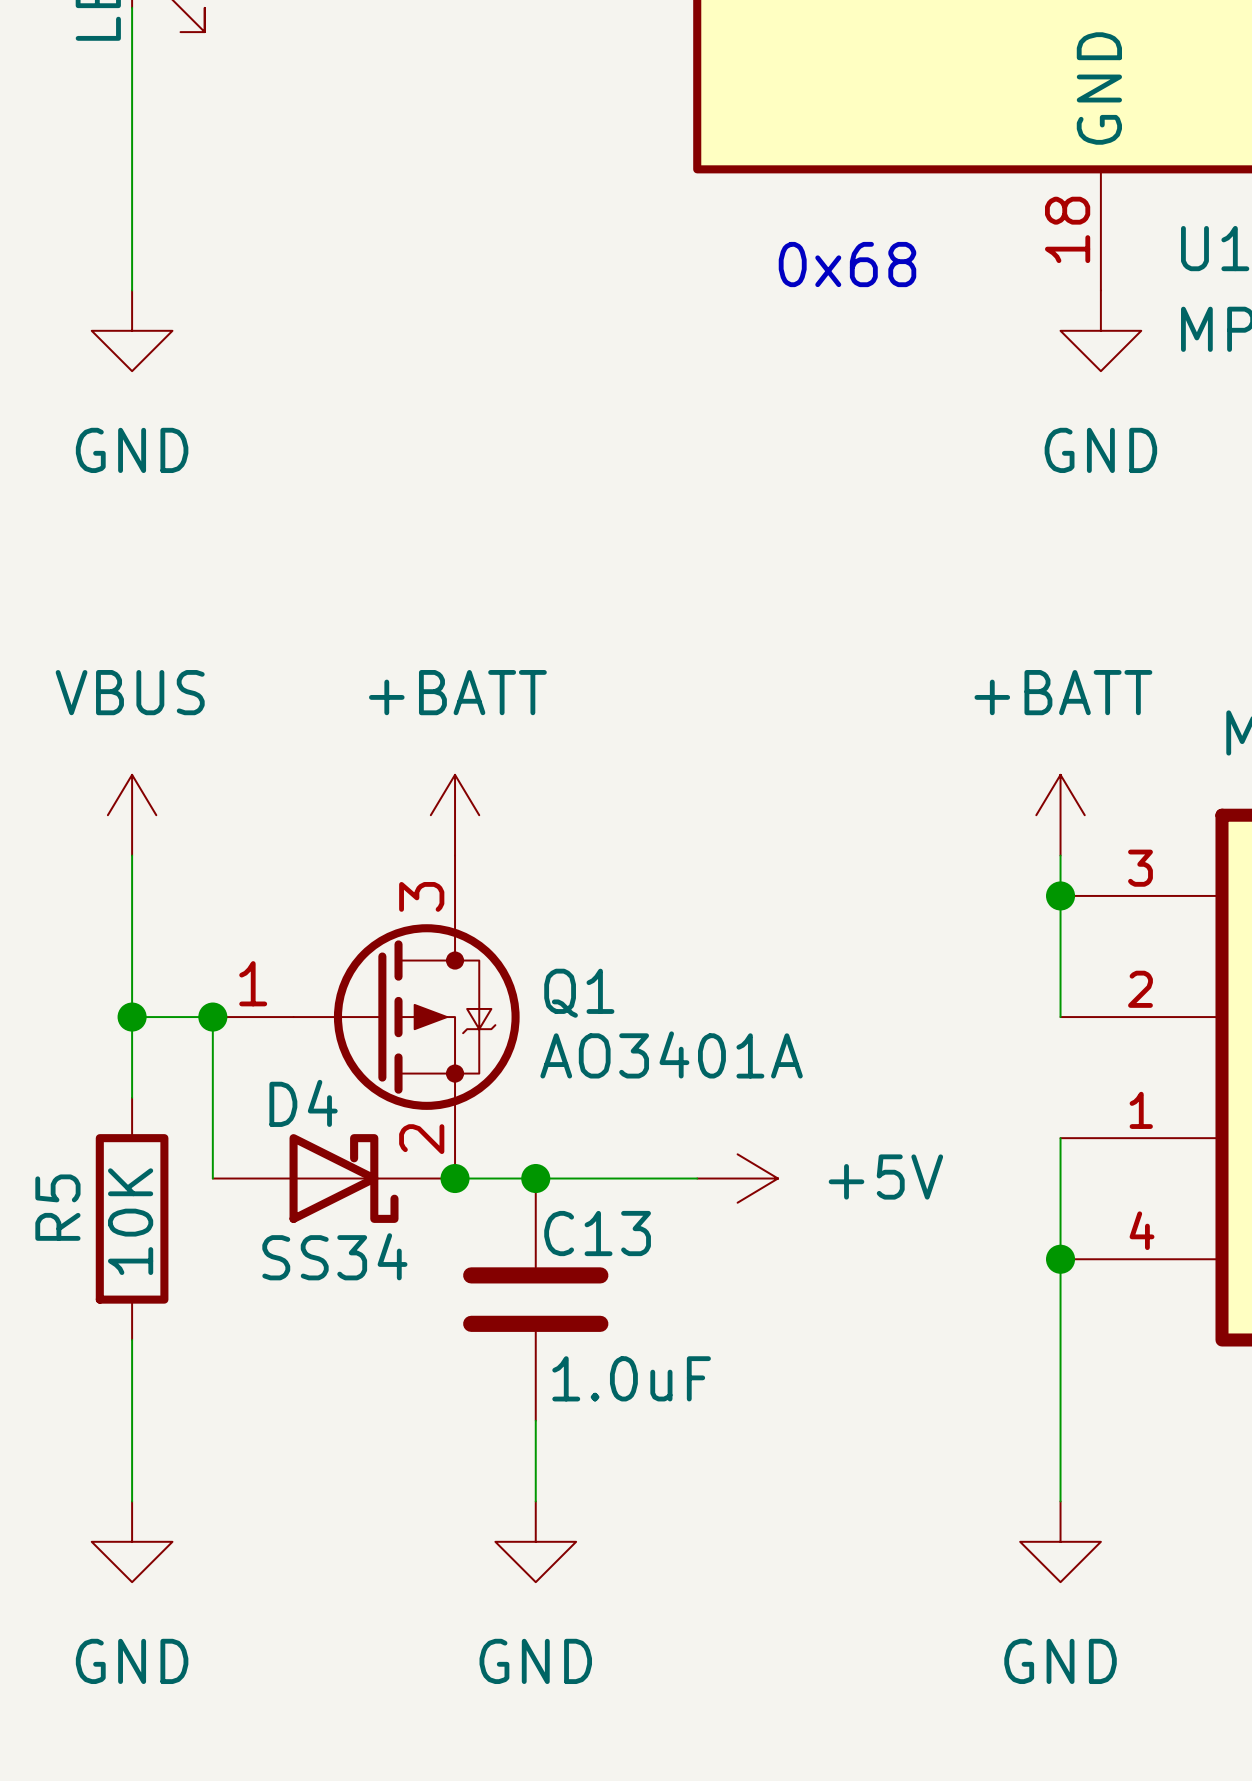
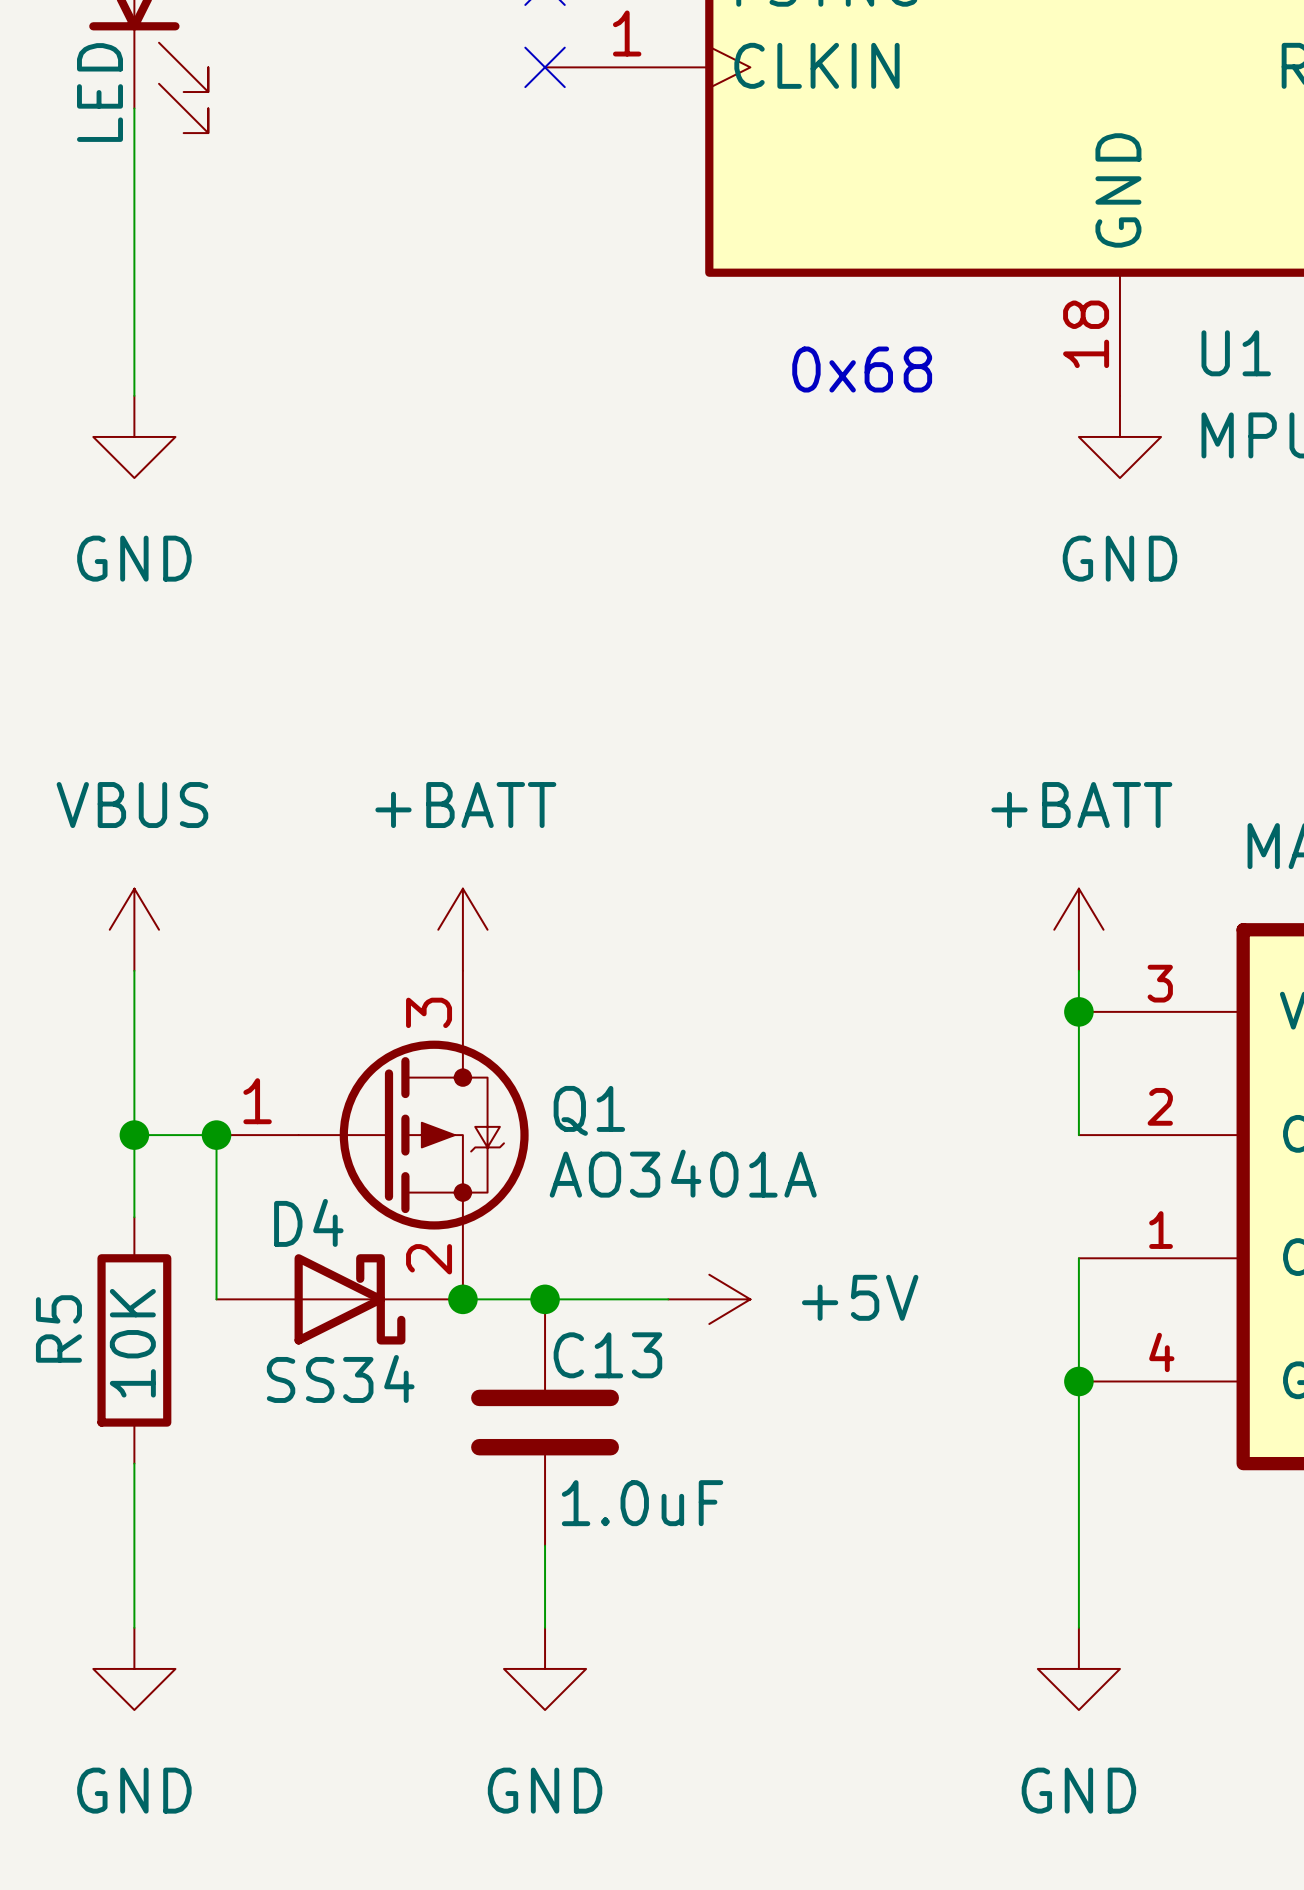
power symbol position: +5V (737, 1178) -> +5V (709, 1299)

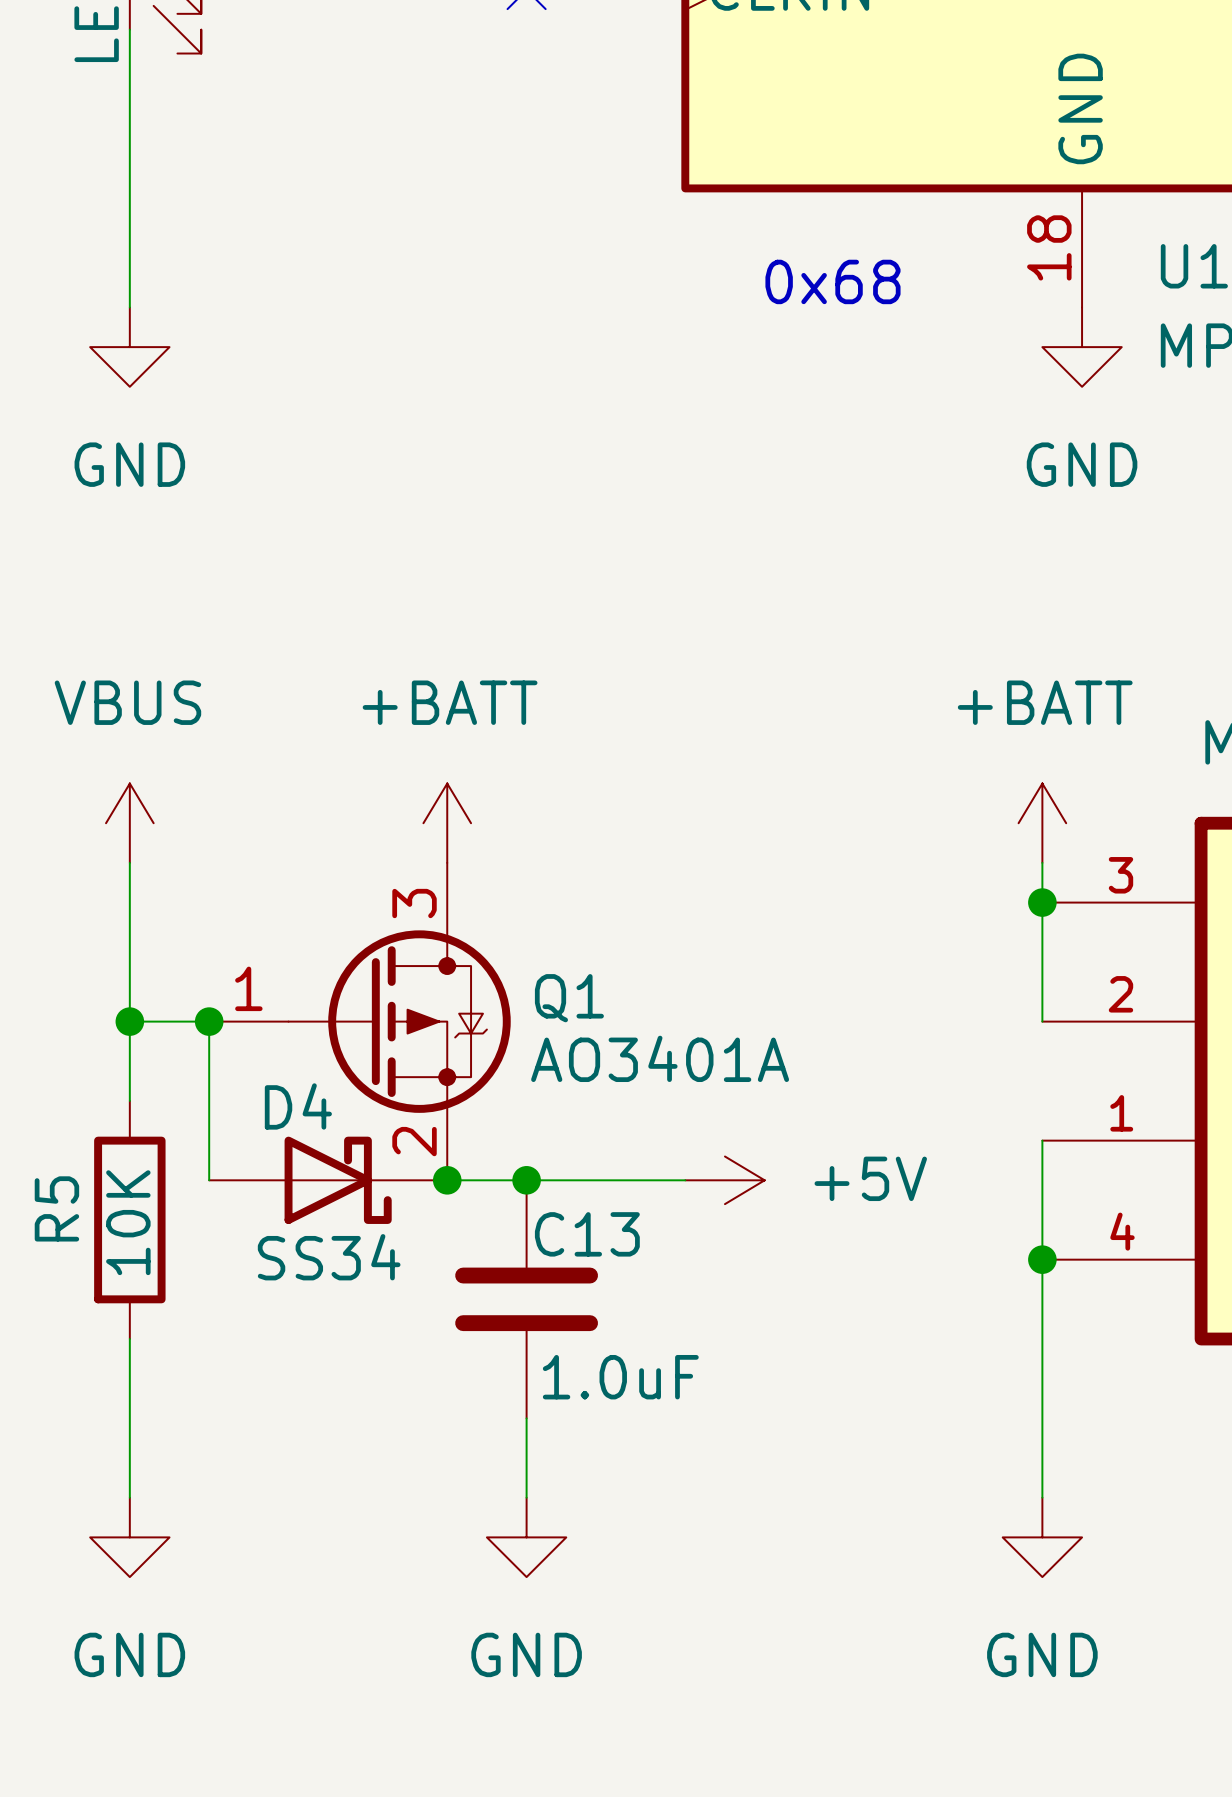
power symbol position: +5V (709, 1299) -> +5V (724, 1180)

